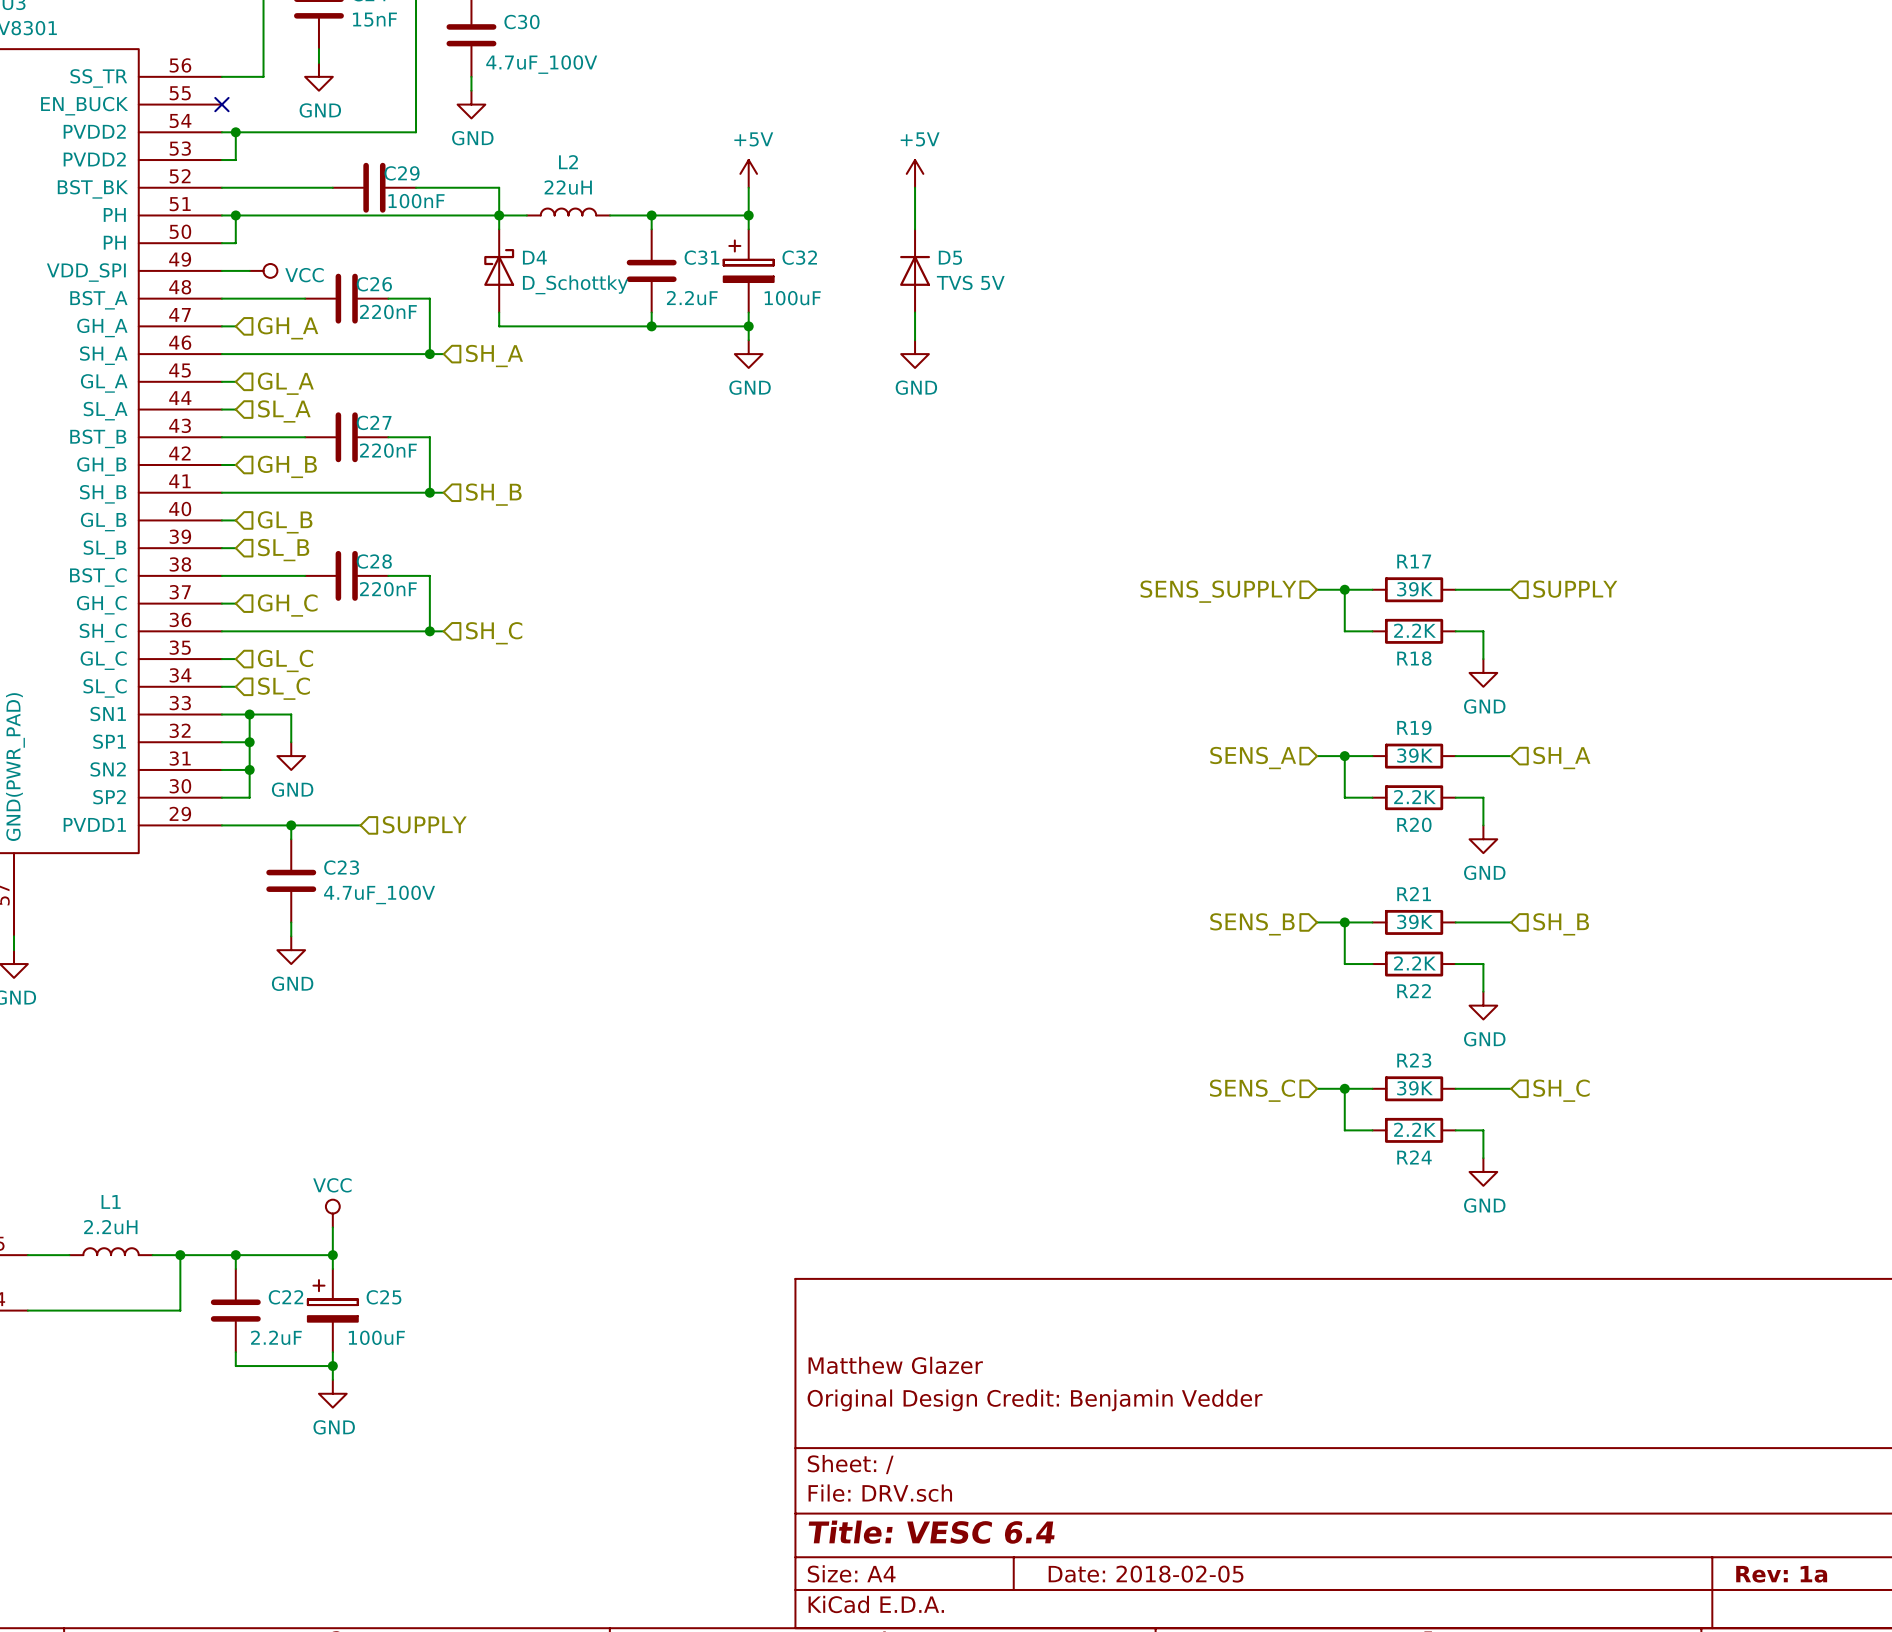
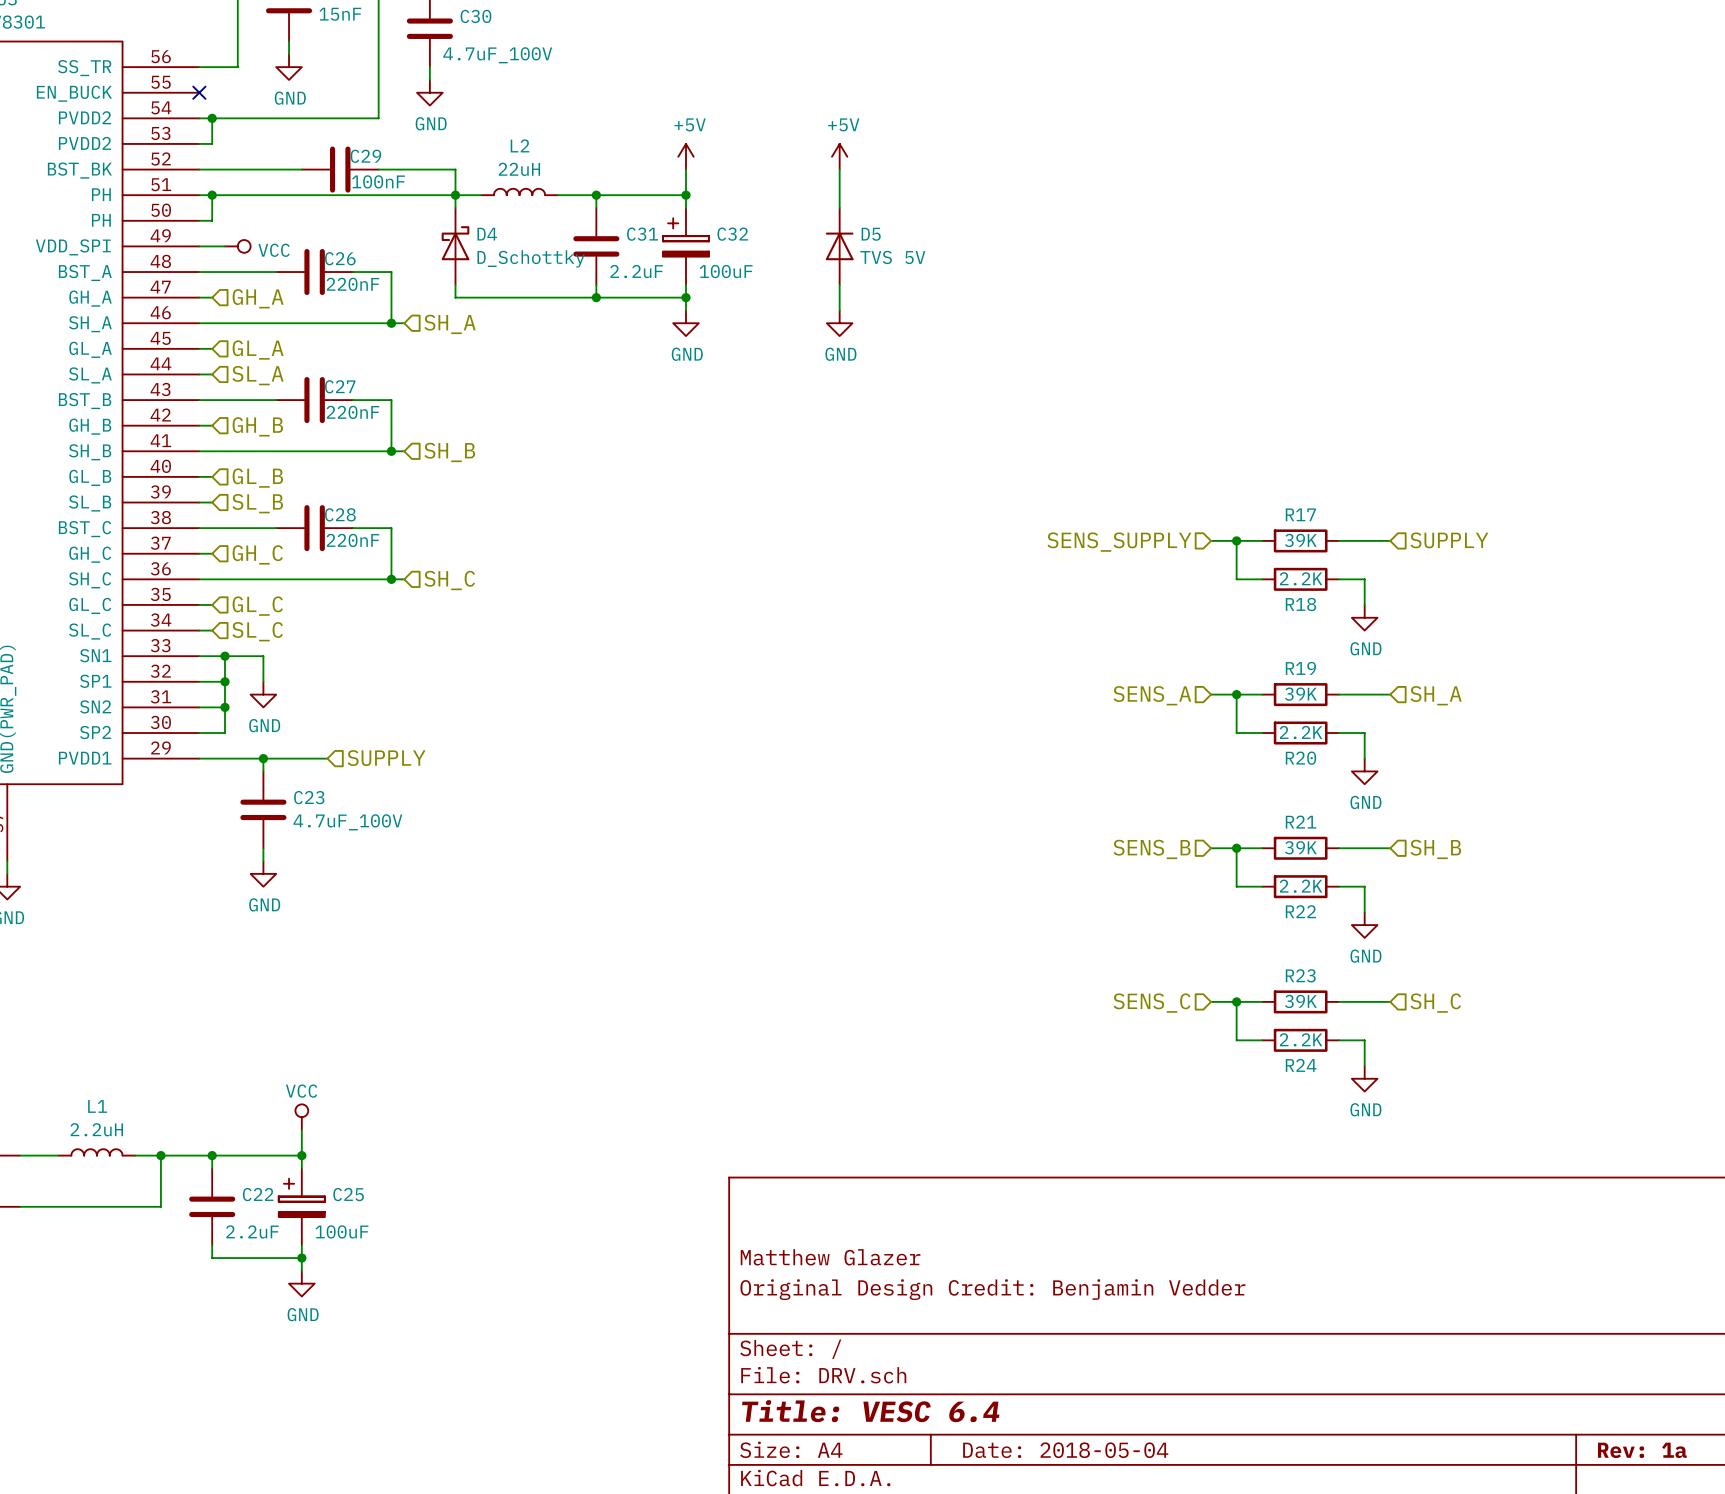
title block: Date: 2018-02-05 (1146, 1574) -> Date: 2018-05-04 (1065, 1450)

